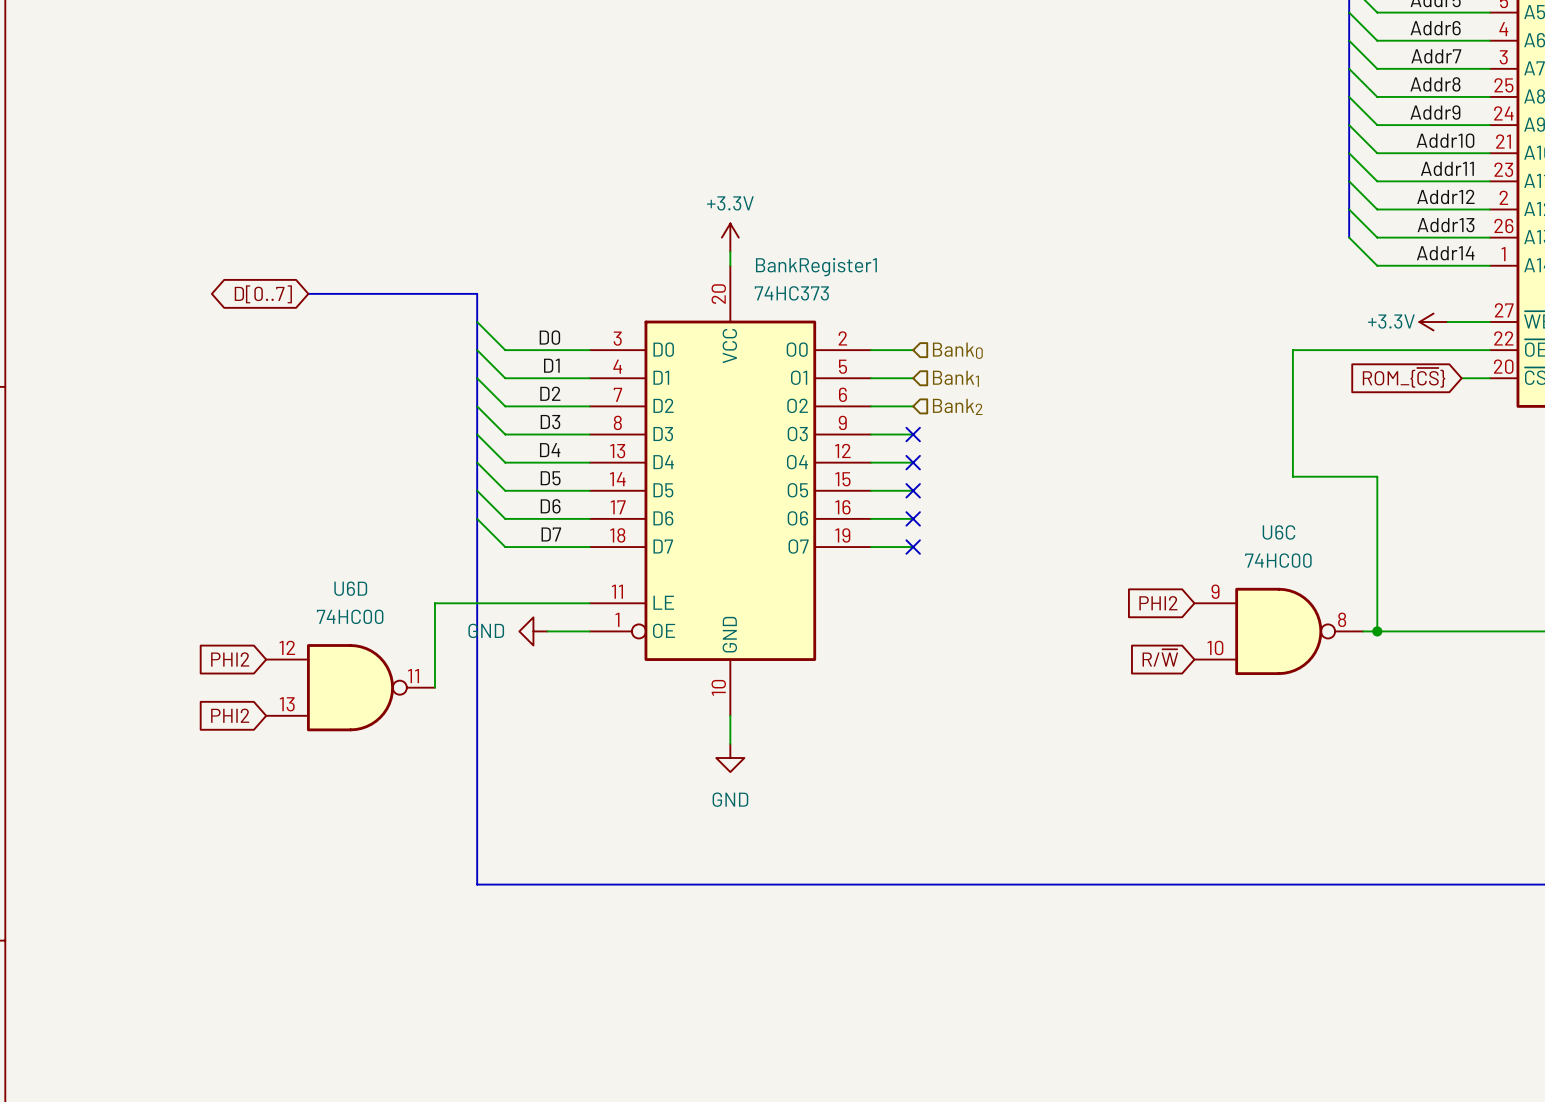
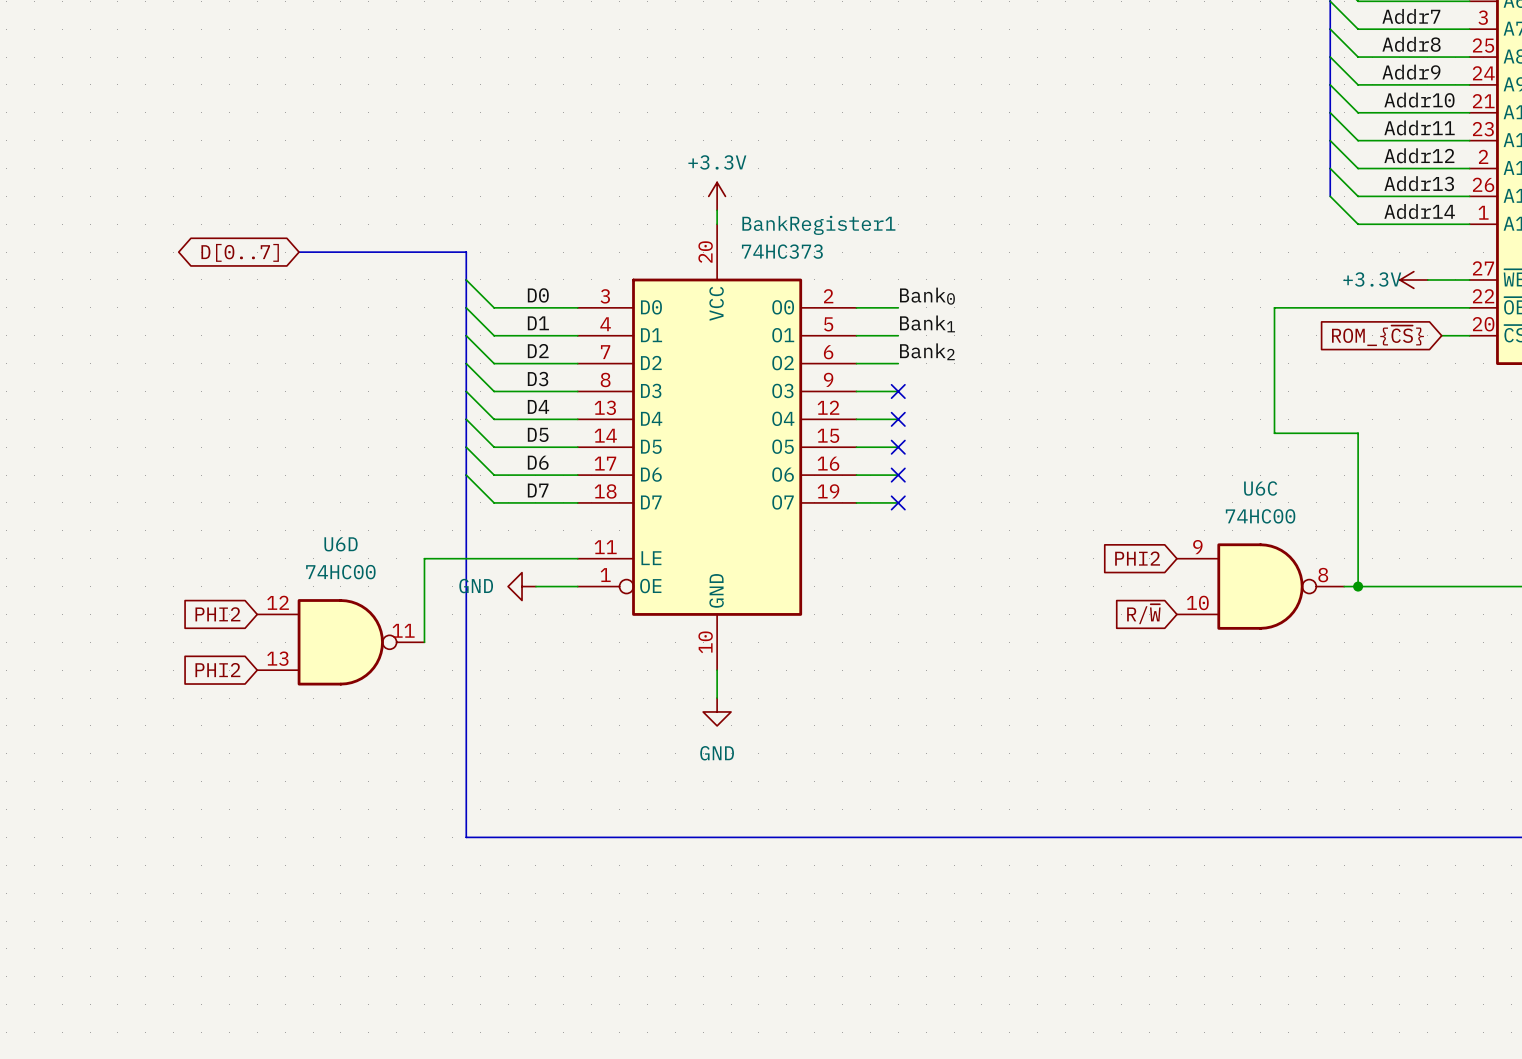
label: none -> Bank0 (927, 296)
hierarchical label: Bank0 (957, 350) -> none
label: none -> Bank1 (927, 323)
hierarchical label: Bank1 (955, 378) -> none
label: none -> Bank2 (927, 351)
hierarchical label: Bank2 (957, 406) -> none

